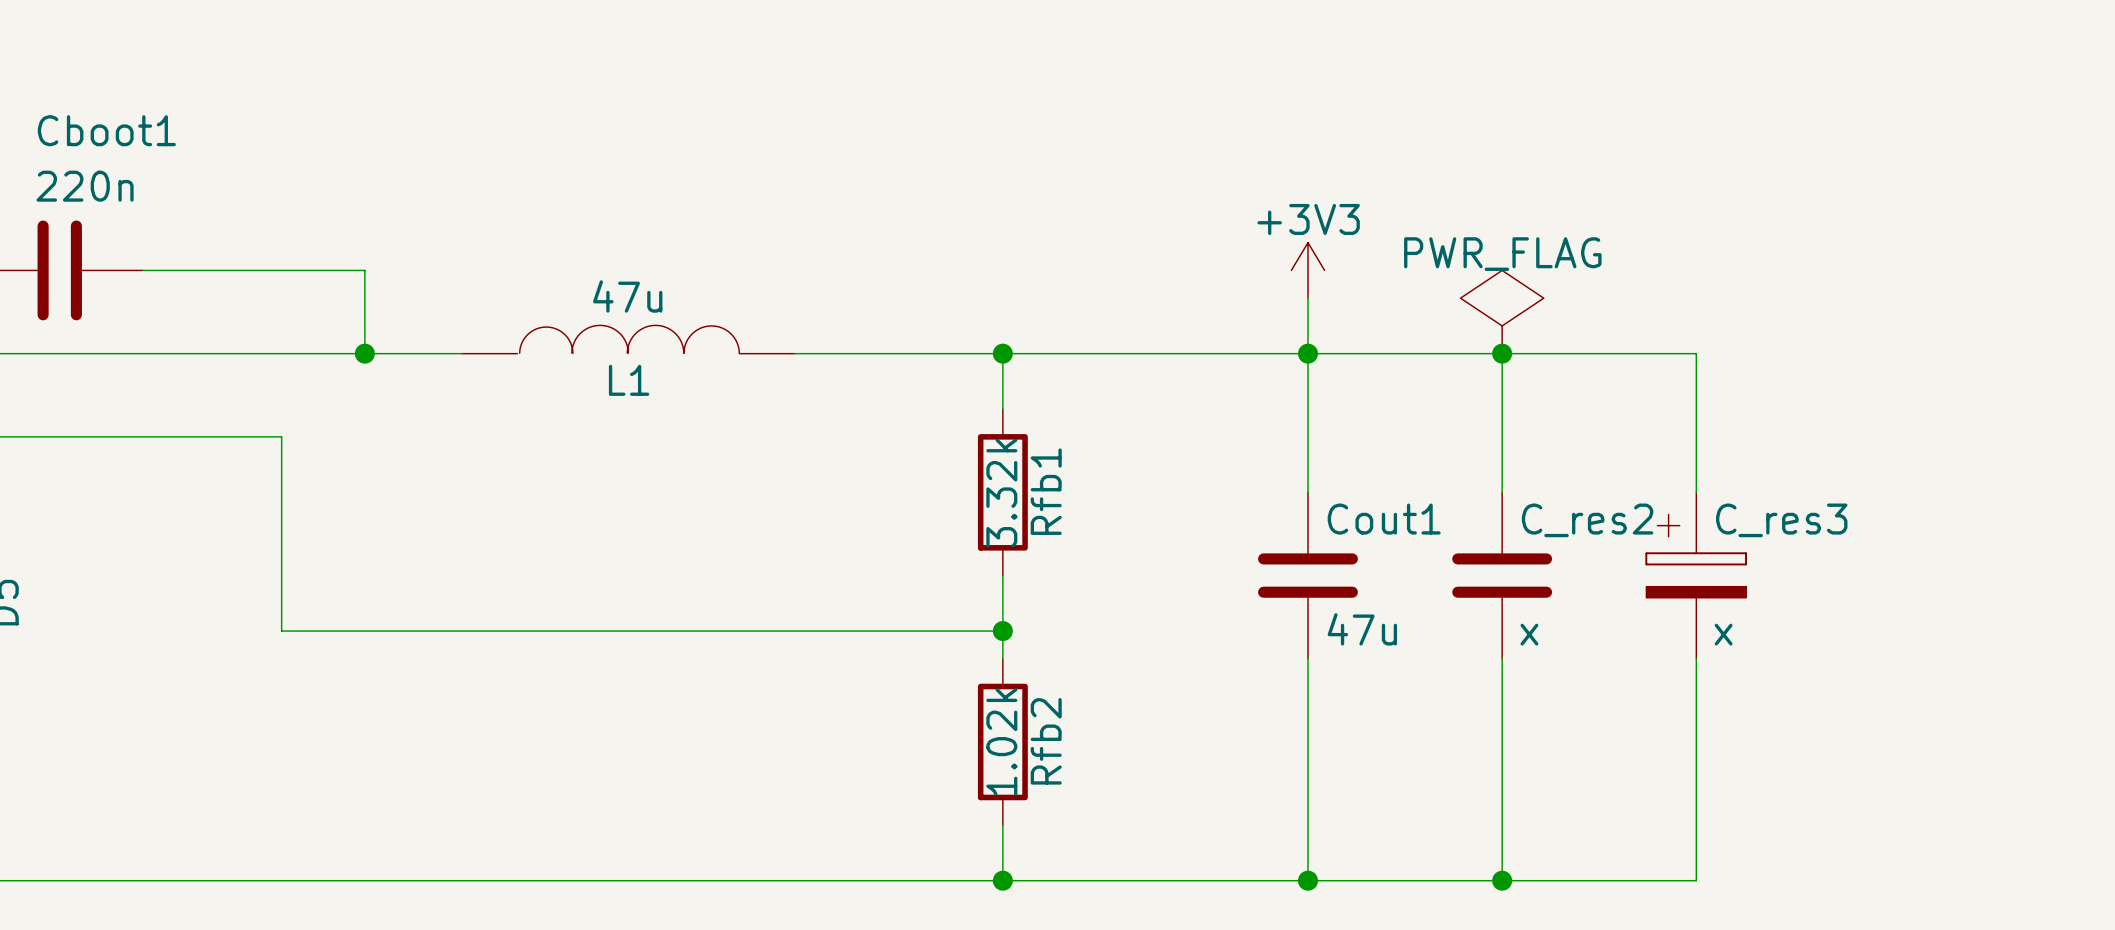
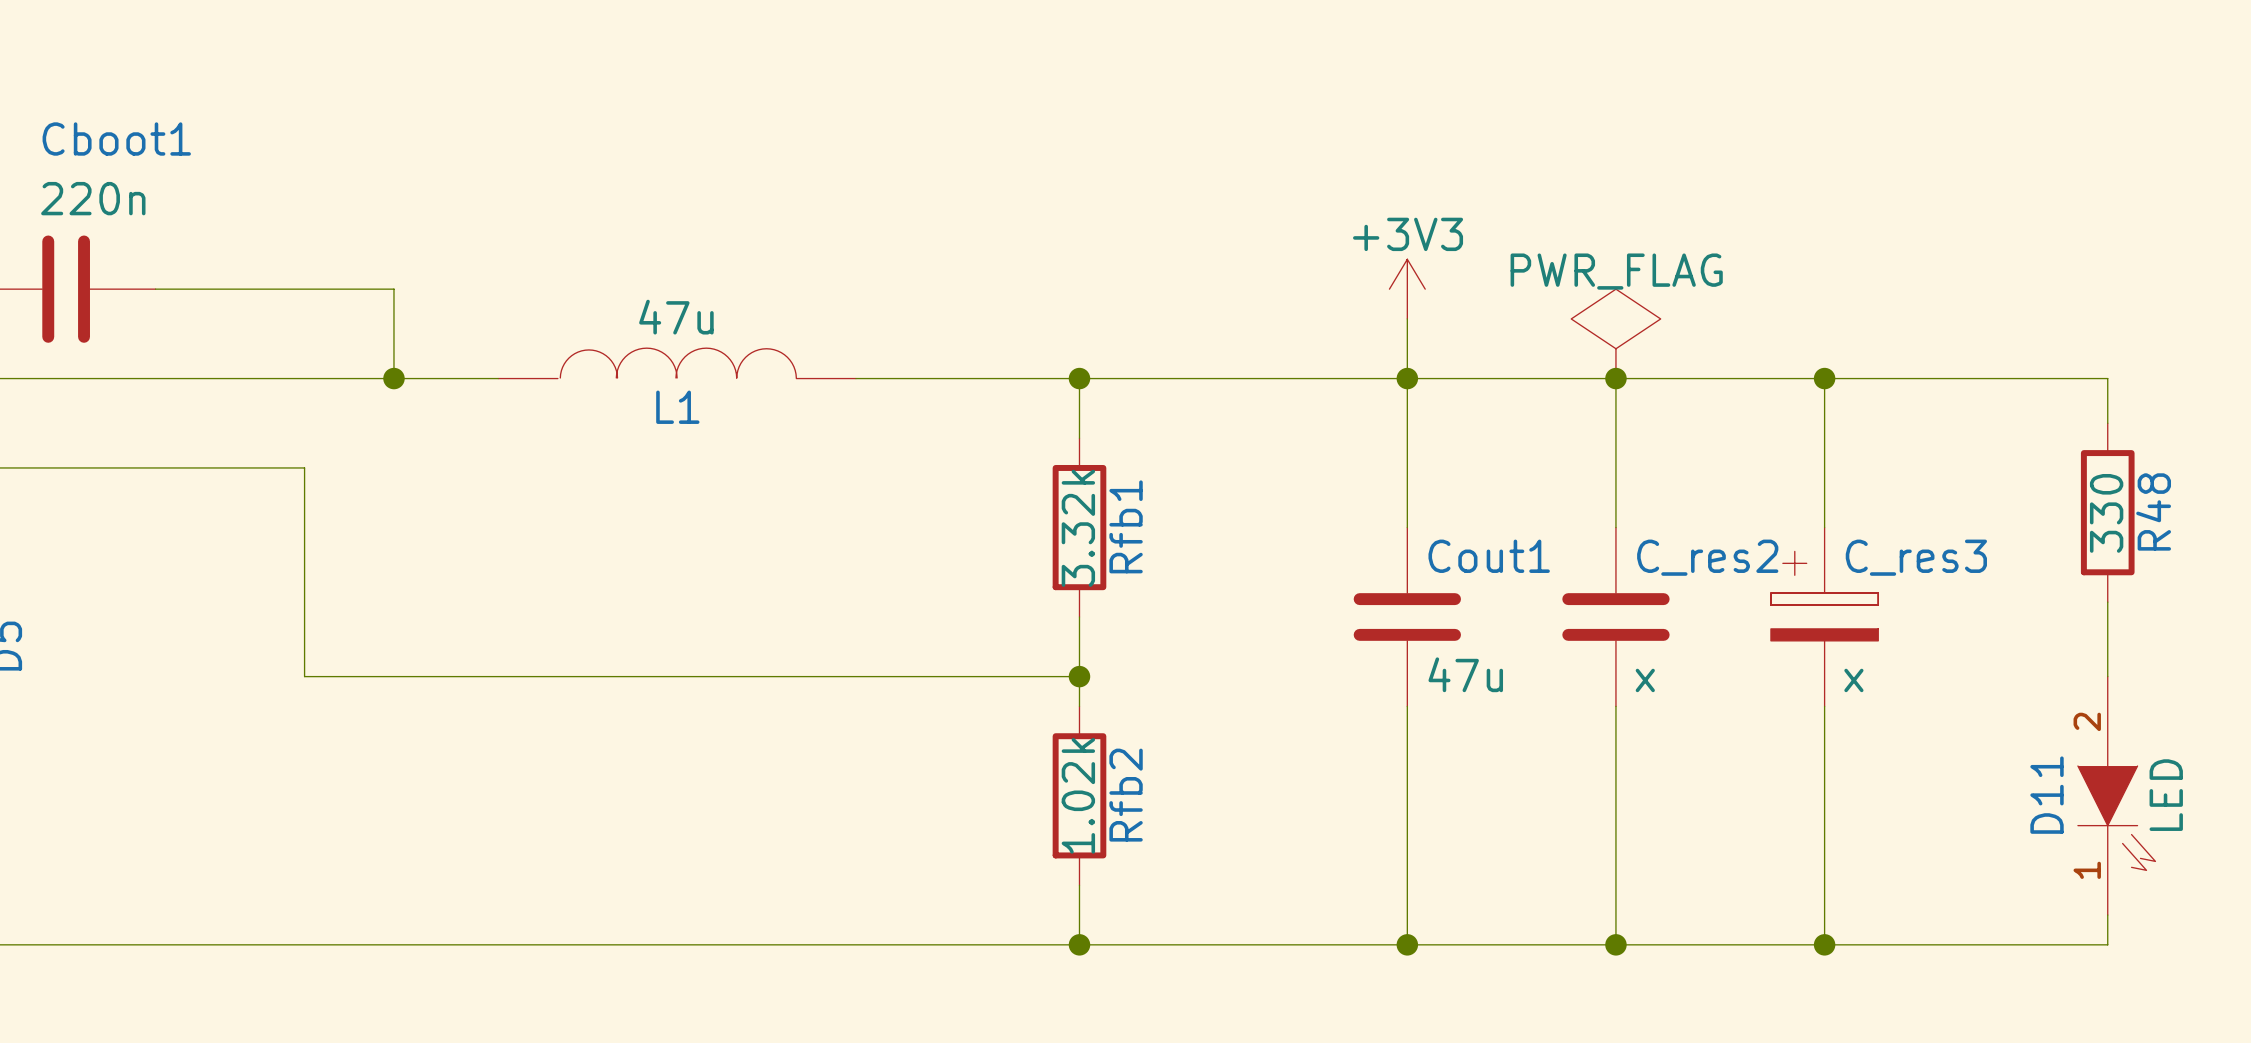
wire: none -> (1824, 378) (2107, 378) (2107, 423)
junction: none -> (1824, 378)
R48: none -> 330 (2107, 512)
wire: none -> (2107, 602) (2107, 676)
D11: none -> LED (2116, 795)
wire: none -> (2107, 915) (2107, 944) (1824, 944)
junction: none -> (1824, 944)

